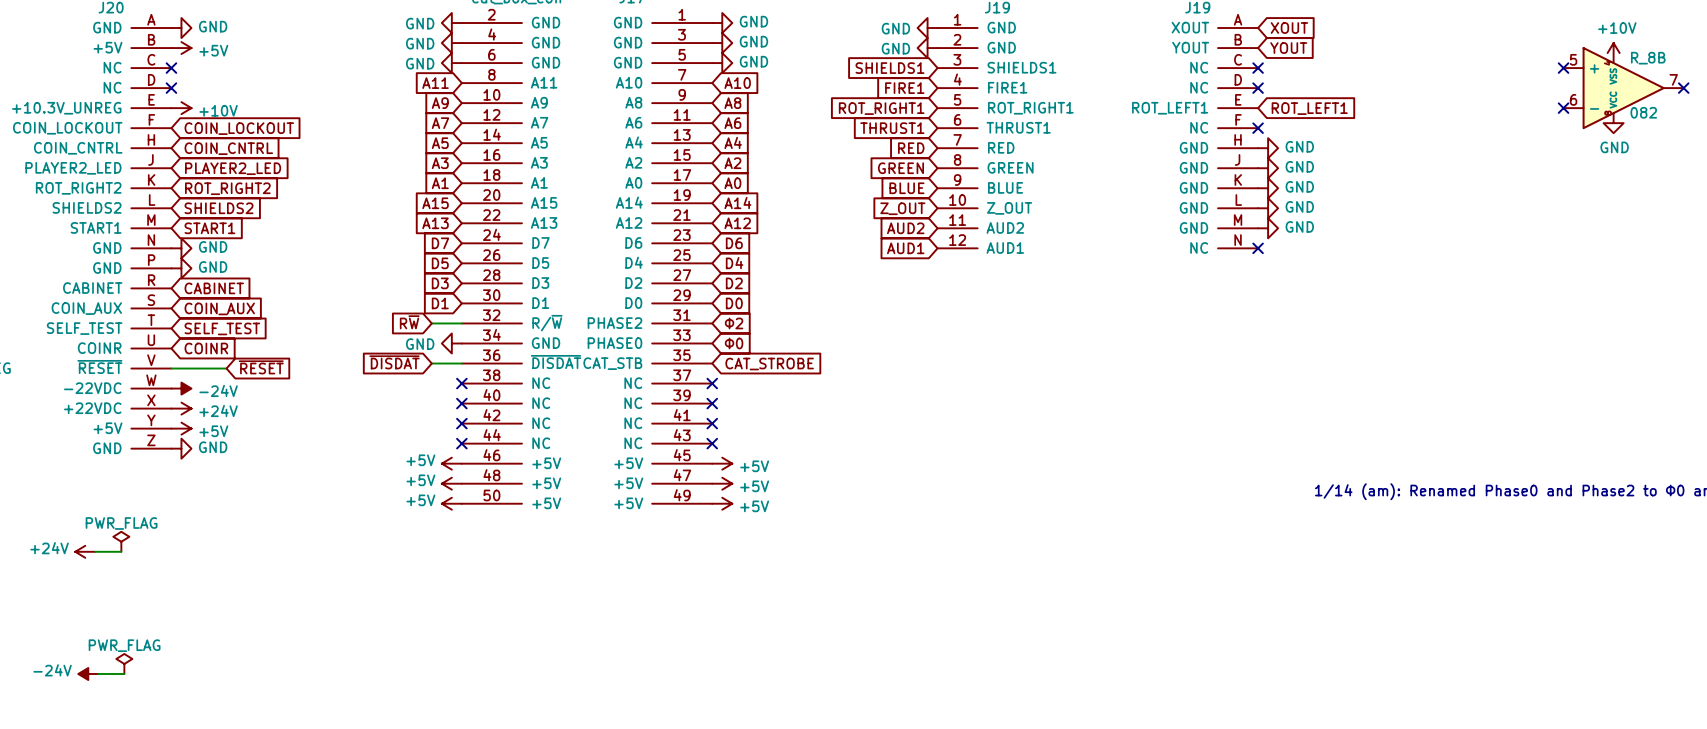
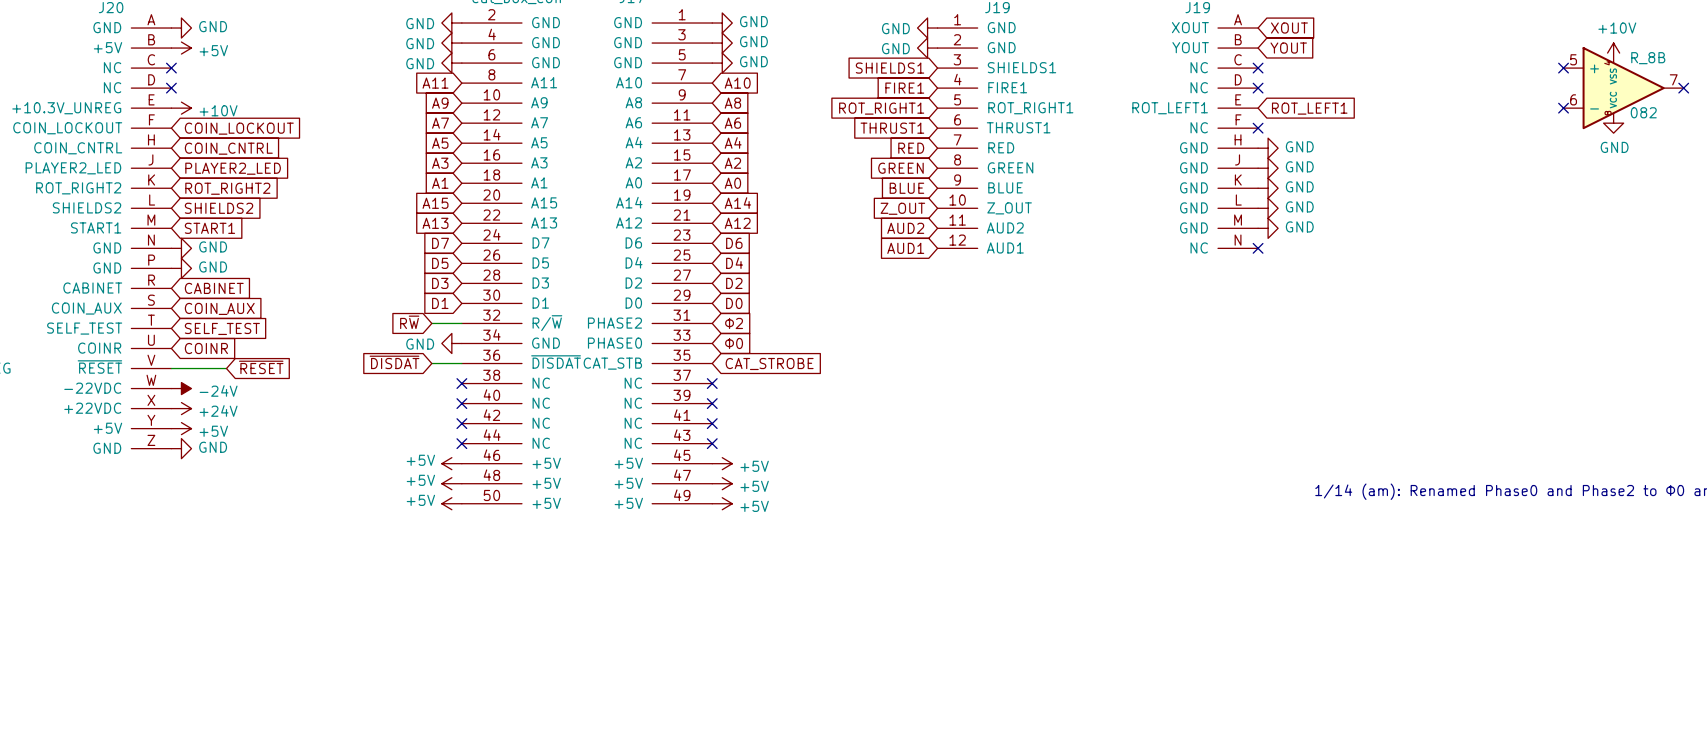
power symbol: PWR_FLAG (121, 541) -> none
power symbol: +24V (85, 551) -> none
wire: (95, 551) (121, 551) -> none
power symbol: PWR_FLAG (124, 663) -> none
power symbol: -24V (88, 673) -> none
wire: (98, 673) (124, 673) -> none

